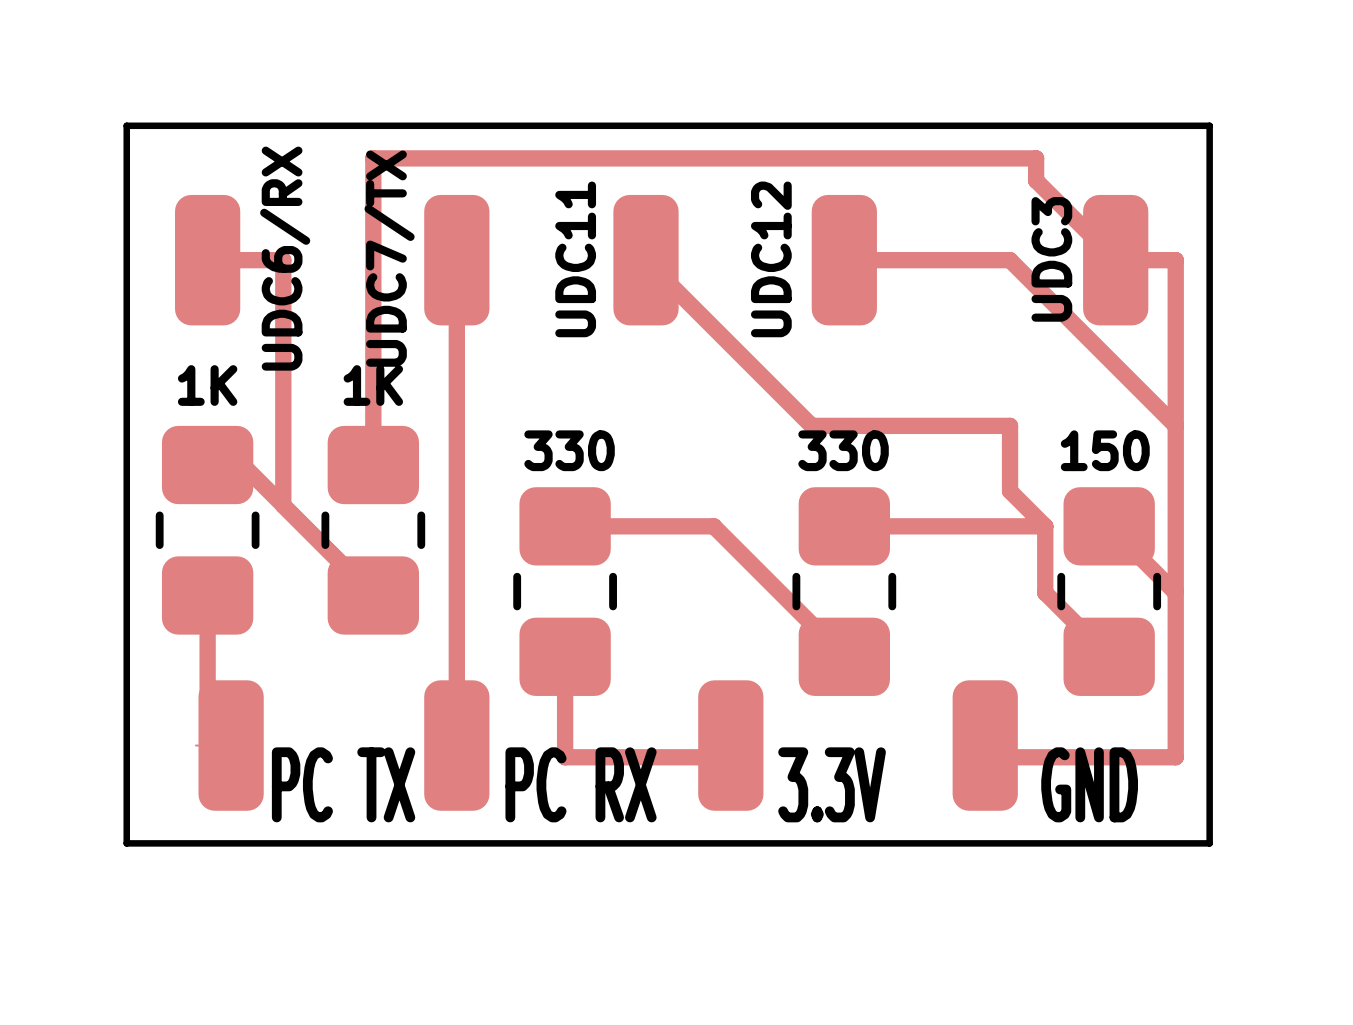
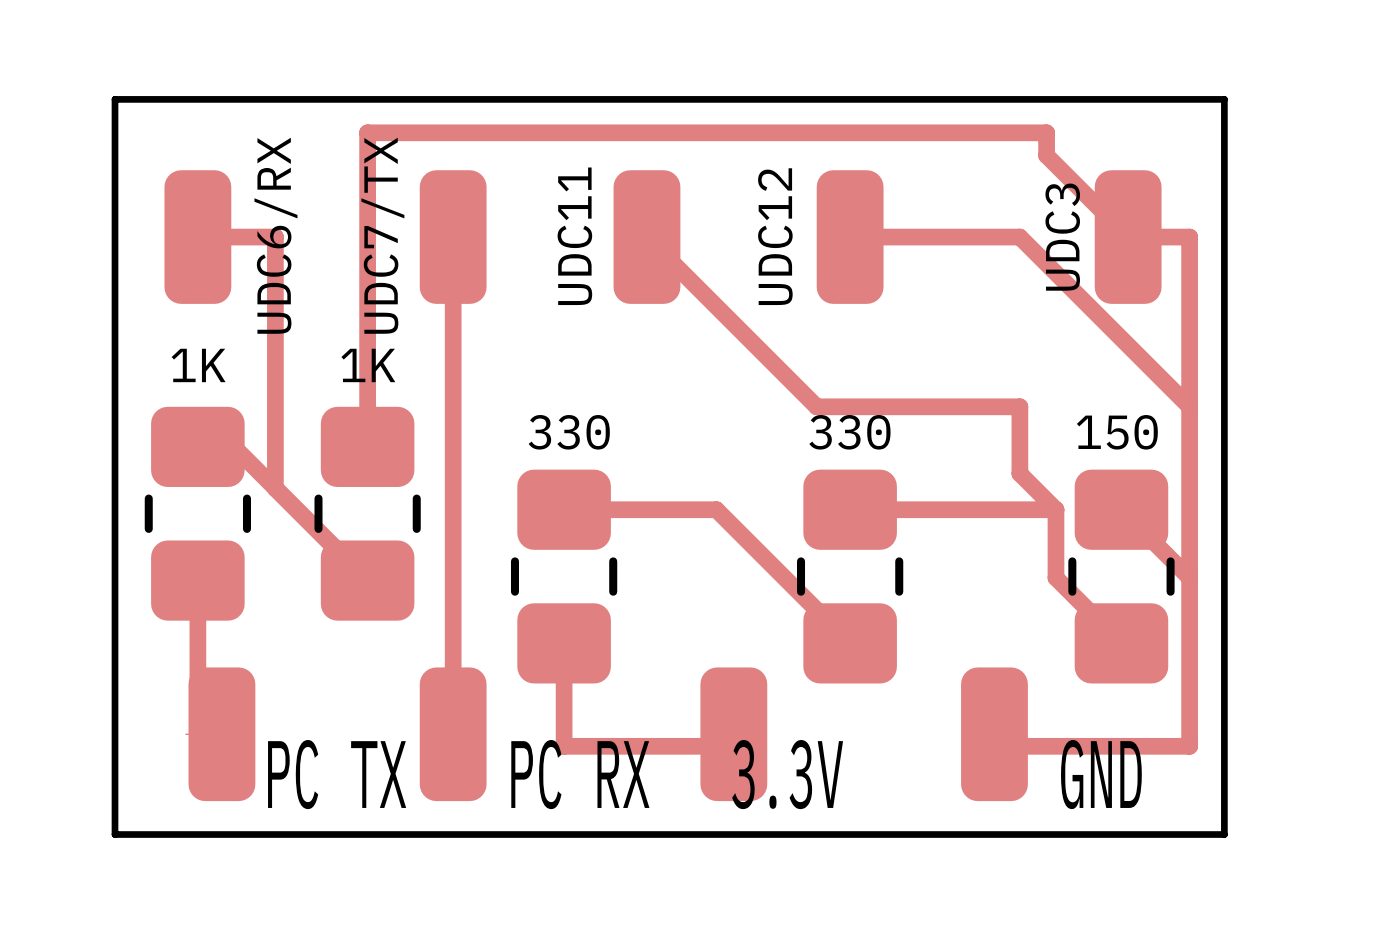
3.3V name position: 3.3V (832, 784) -> 3.3V (787, 774)

